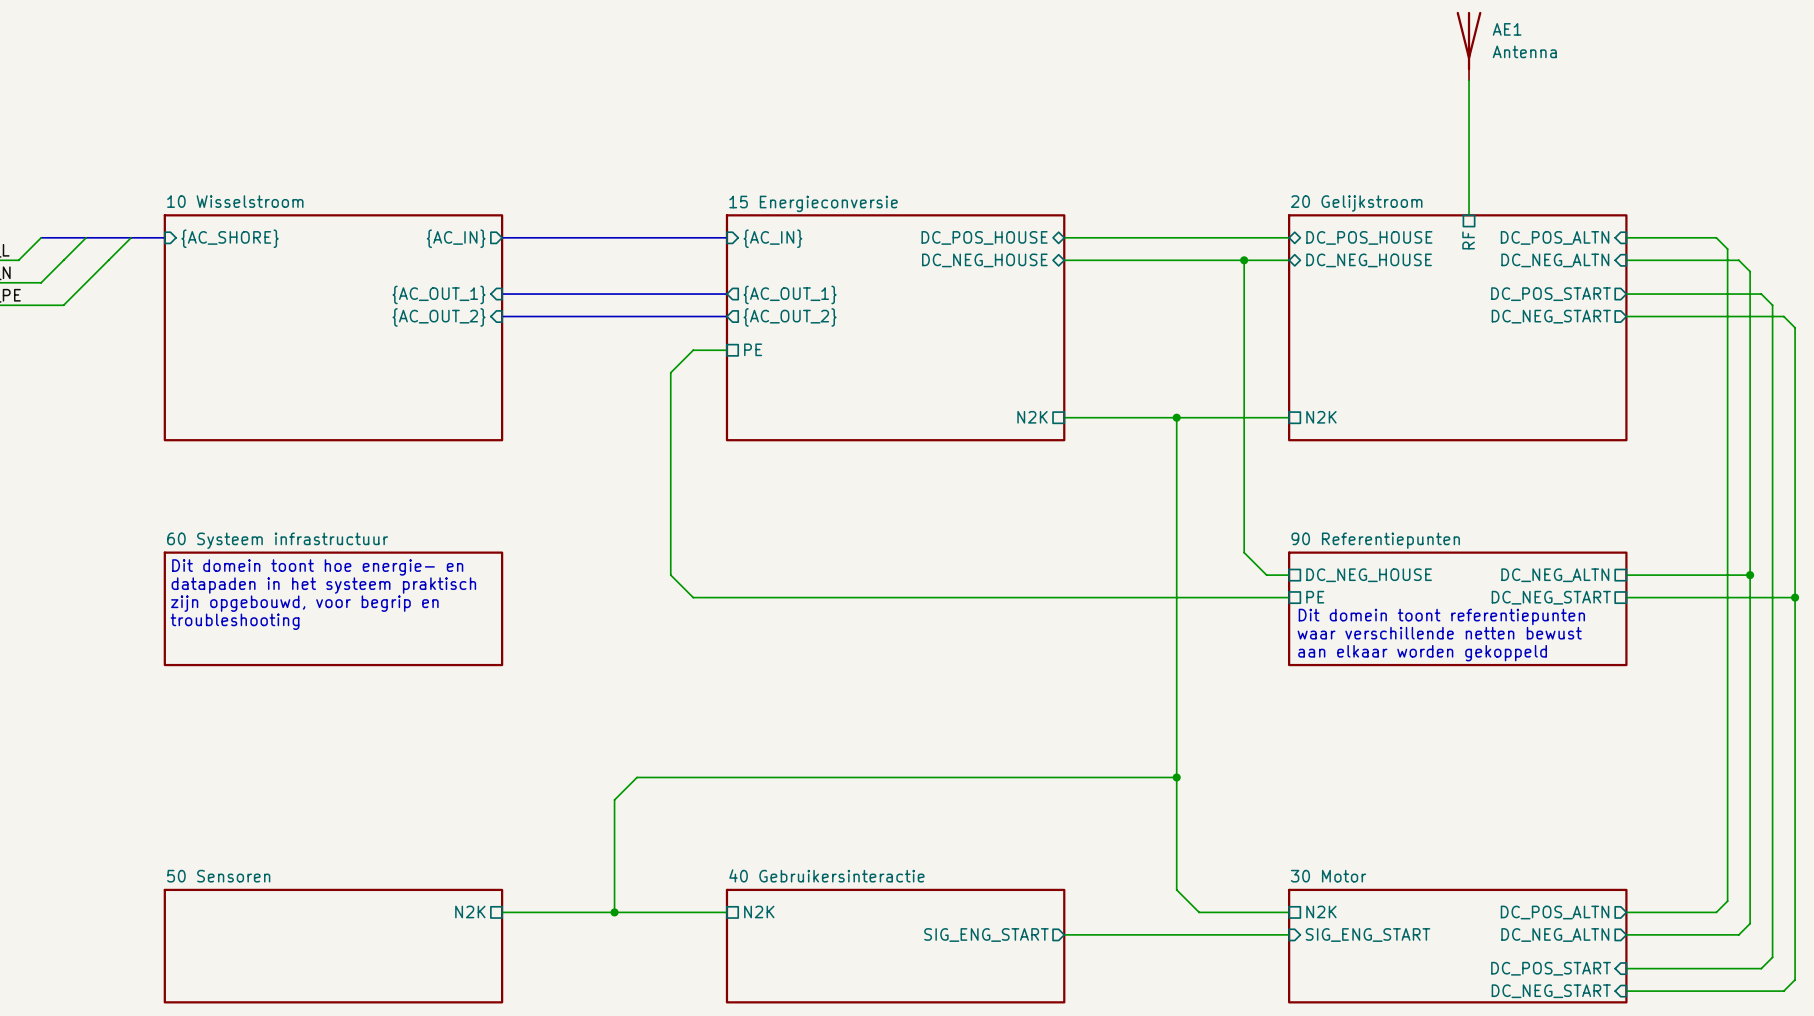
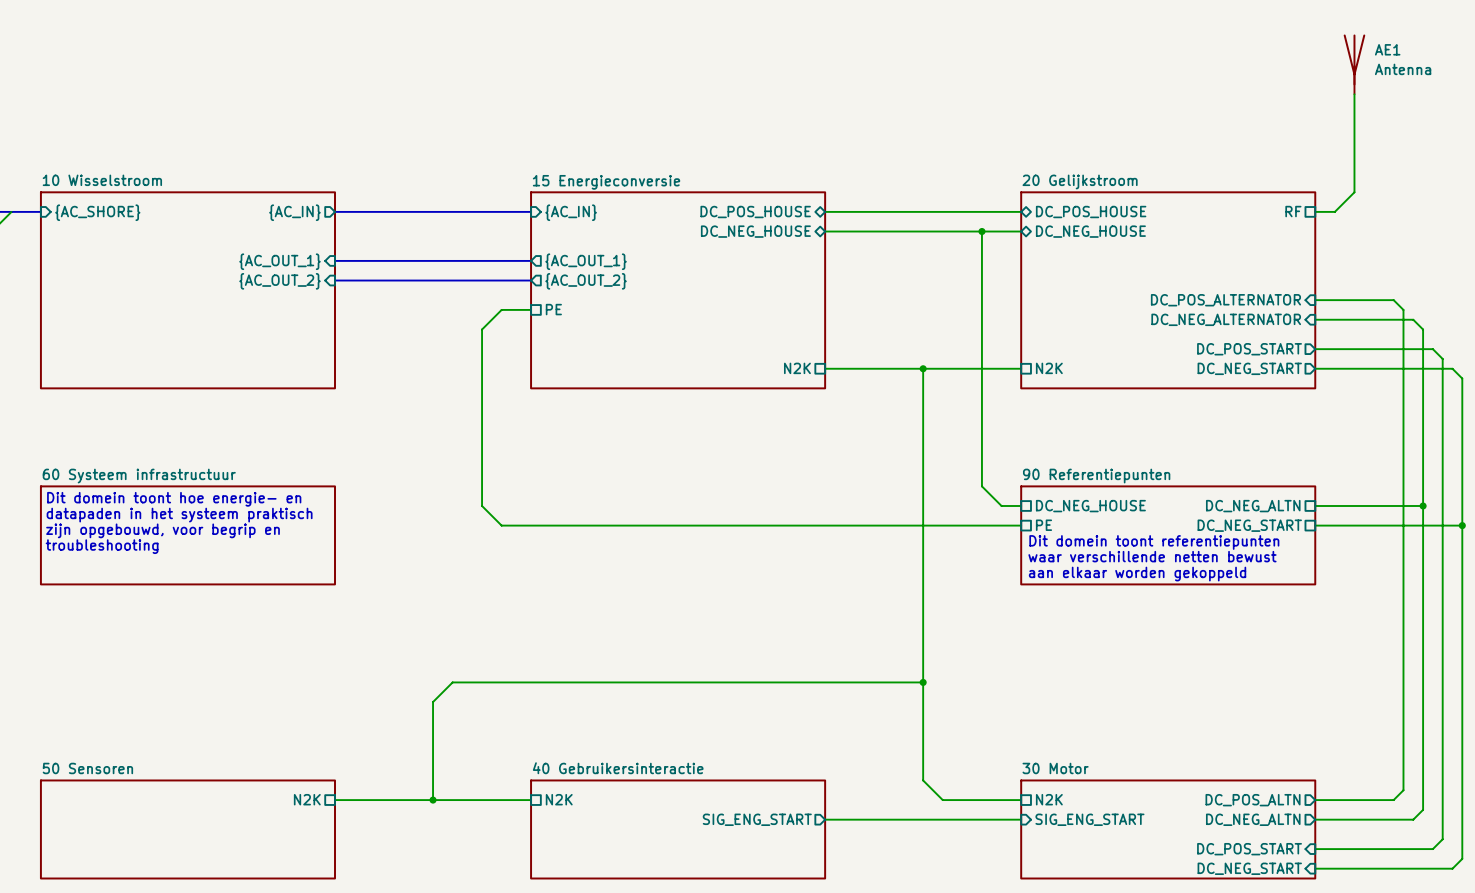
AE1 position: (1469, 46) -> (1354, 64)
wire: (1469, 80) (1469, 215) -> none
wire: none -> (1354, 94) (1354, 192) (1334, 211)
sheet pin shape: input (1555, 237) -> passive (1293, 211)
sheet pin: DC_POS_ALTN (1555, 237) -> RF (1293, 211)
wire: (1648, 237) (1716, 237) (1727, 249) (1727, 350) -> (1315, 300) (1393, 300) (1403, 309)
sheet pin: RF (1468, 240) -> none
sheet pin: DC_NEG_ALTN (1555, 260) -> none
wire: (1626, 260) (1738, 260) (1750, 271) (1750, 372) -> (1315, 319) (1413, 319) (1423, 329)
sheet pin position: DC_POS_START (1551, 294) -> DC_POS_START (1249, 349)
wire: (1626, 294) (1761, 294) (1772, 305) (1772, 406) -> (1315, 349) (1432, 349) (1442, 358)
sheet pin position: DC_NEG_START (1551, 316) -> DC_NEG_START (1249, 368)
wire: (1626, 316) (1783, 316) (1795, 327) (1795, 428) -> (1315, 368) (1452, 368) (1462, 378)
sheet pin: none -> DC_POS_ALTERNATOR (1225, 300)
sheet pin: none -> DC_NEG_ALTERNATOR (1226, 319)

